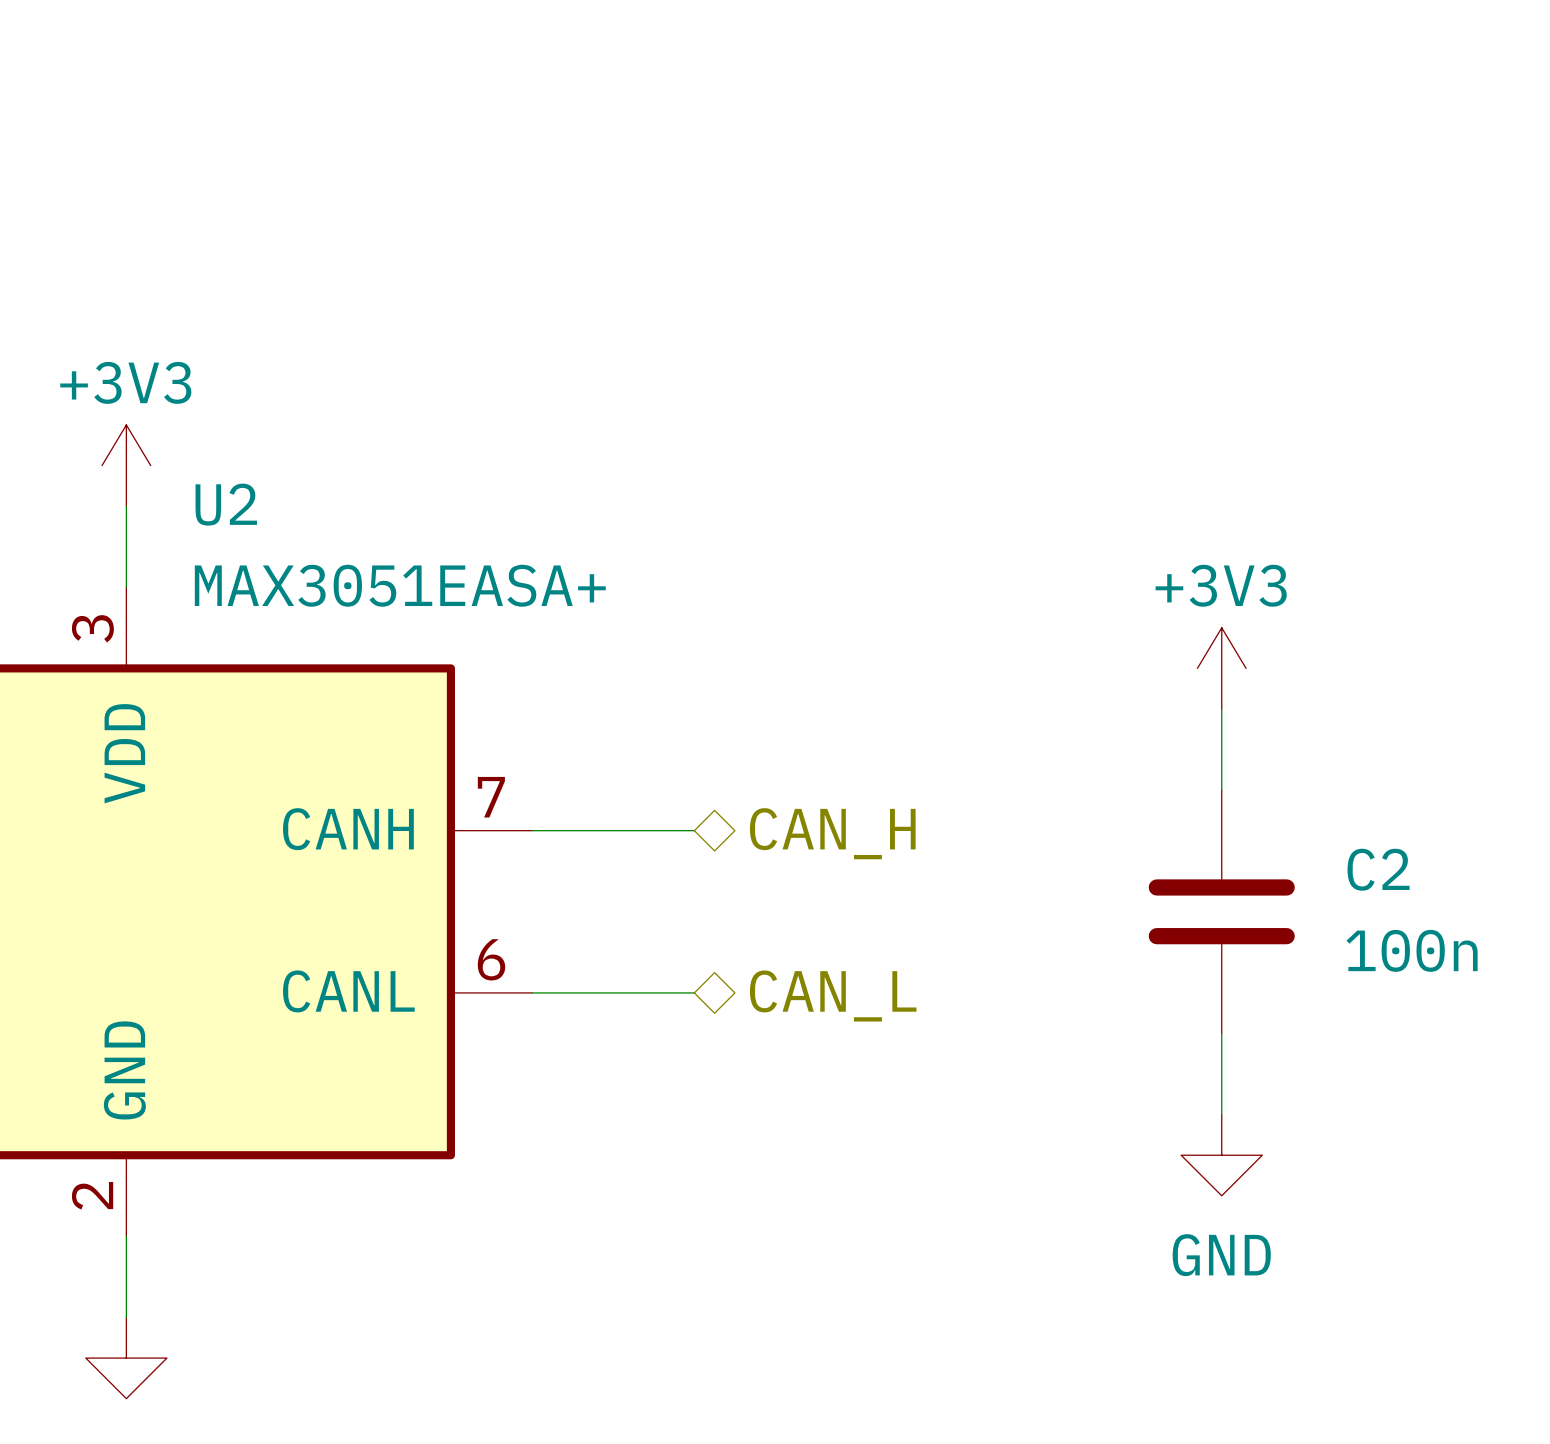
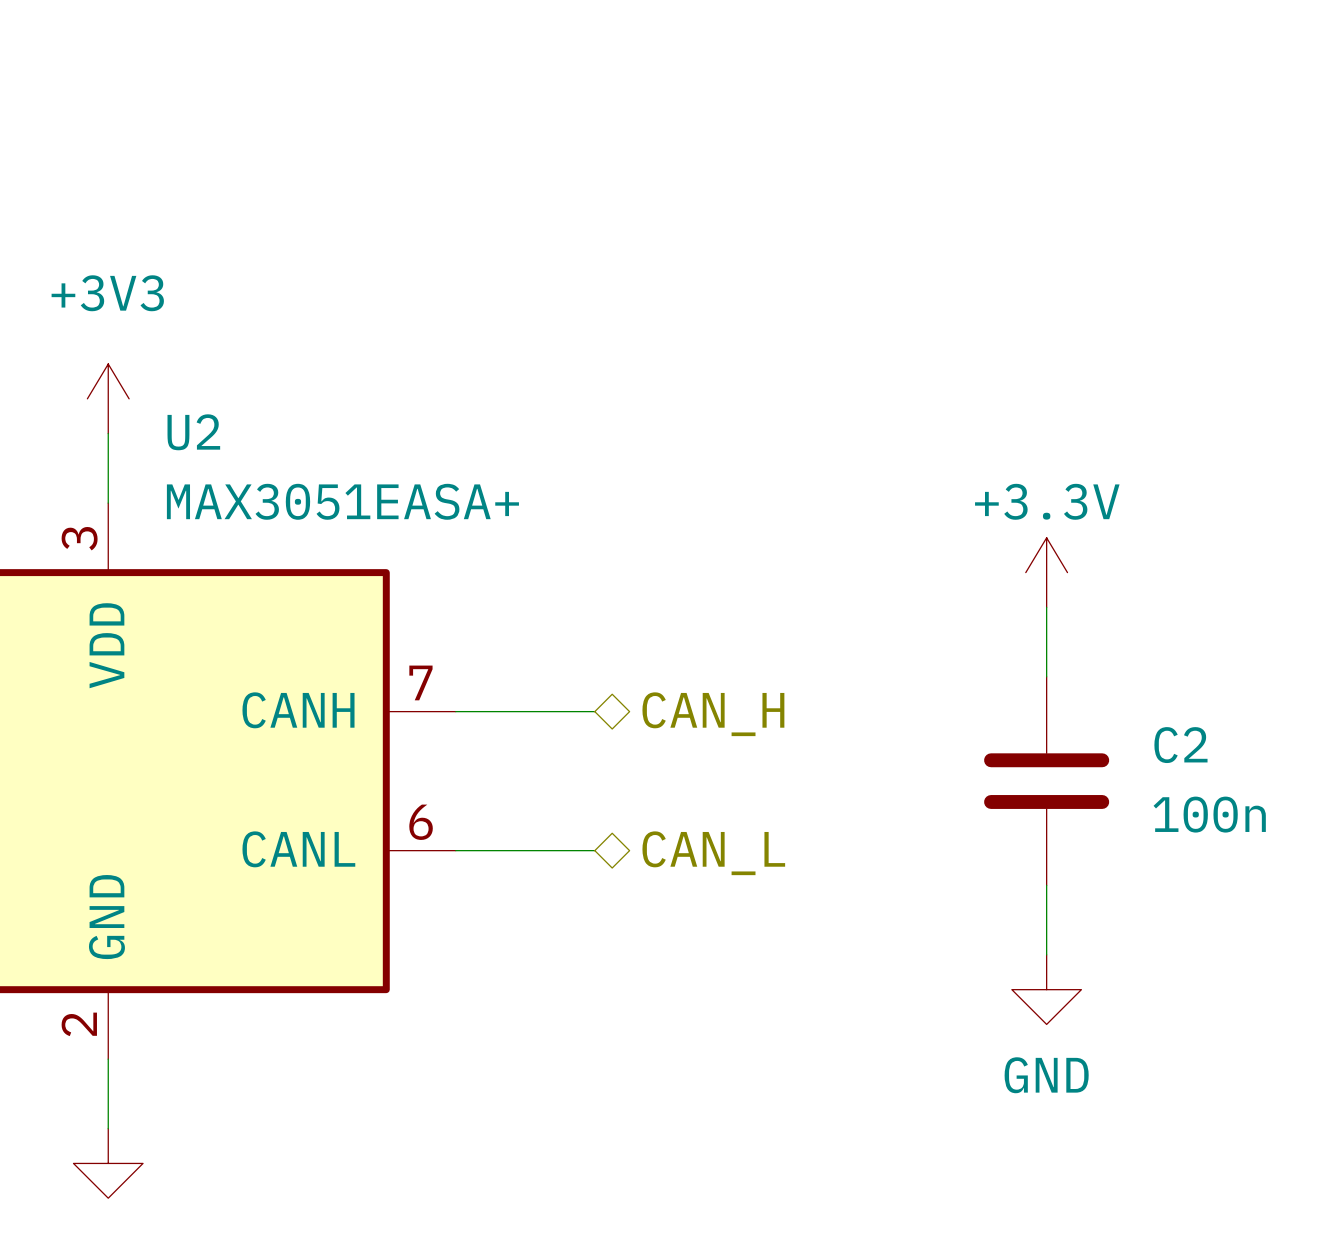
power symbol text position: +3V3 (125, 382) -> +3V3 (107, 293)
power symbol: +3V3 (1221, 668) -> +3.3V (1046, 572)

